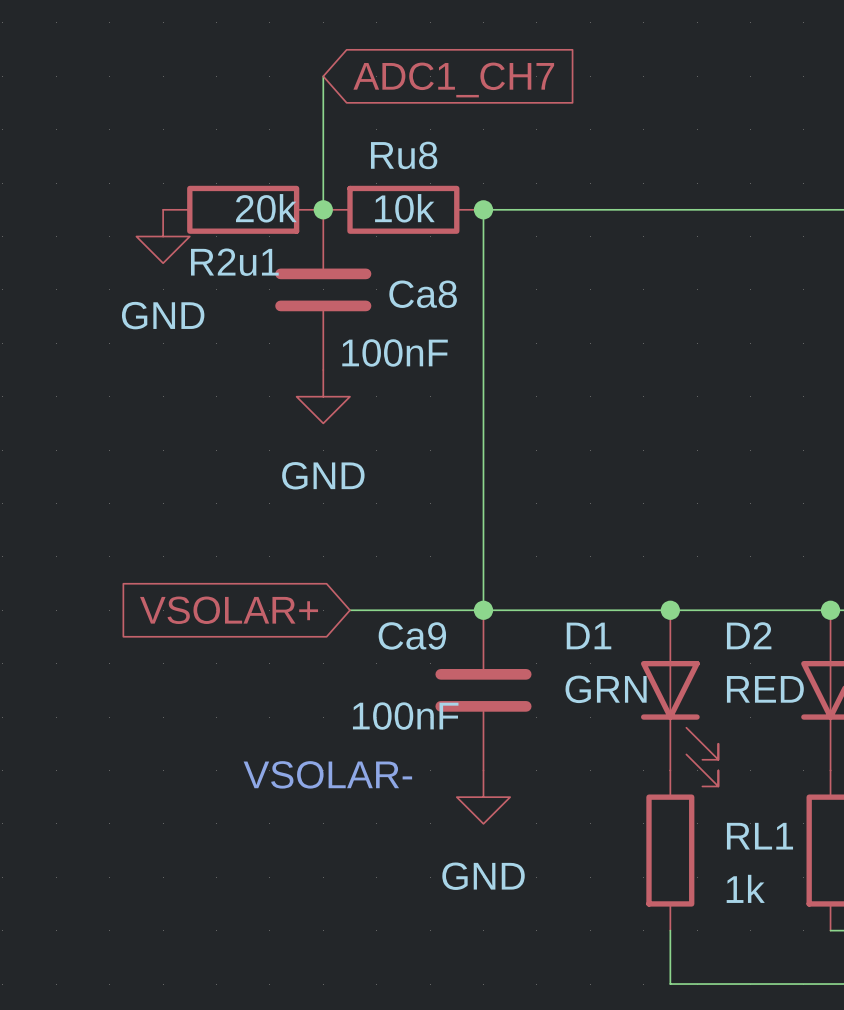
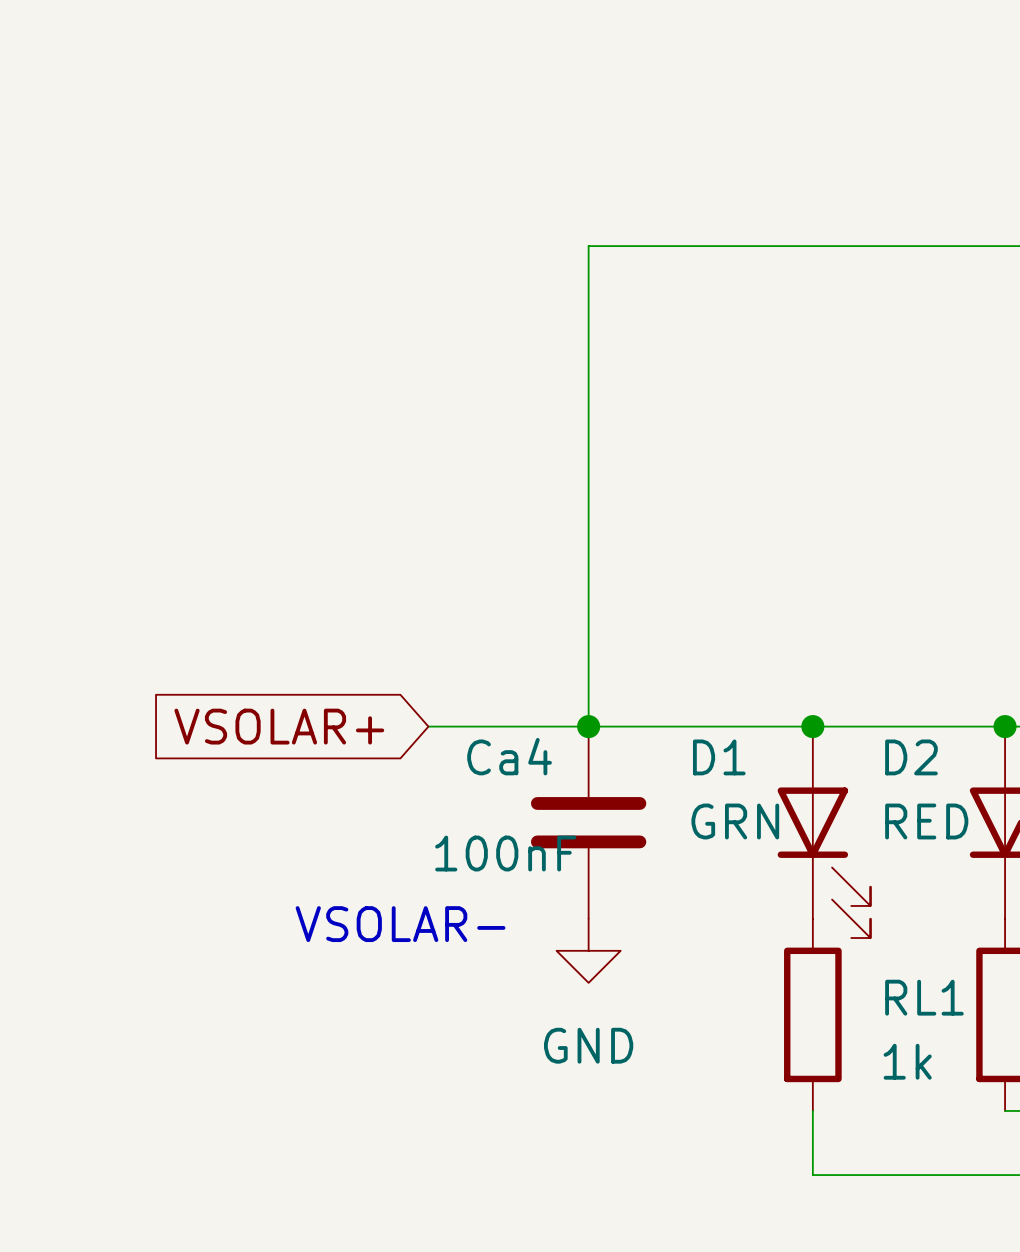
wire: (323, 76) (323, 209) -> none
global label: ADC1_CH7 (453, 79) -> none
R2u1: 20k (243, 209) -> none
junction: (323, 209) -> none
Ru8: 10k (403, 209) -> none
junction: (483, 209) -> none
power symbol: GND (163, 236) -> none
Ca8: 100nF (323, 289) -> none
power symbol: GND (323, 396) -> none
Ca9 name: Ca9 (412, 635) -> Ca4 (509, 756)

